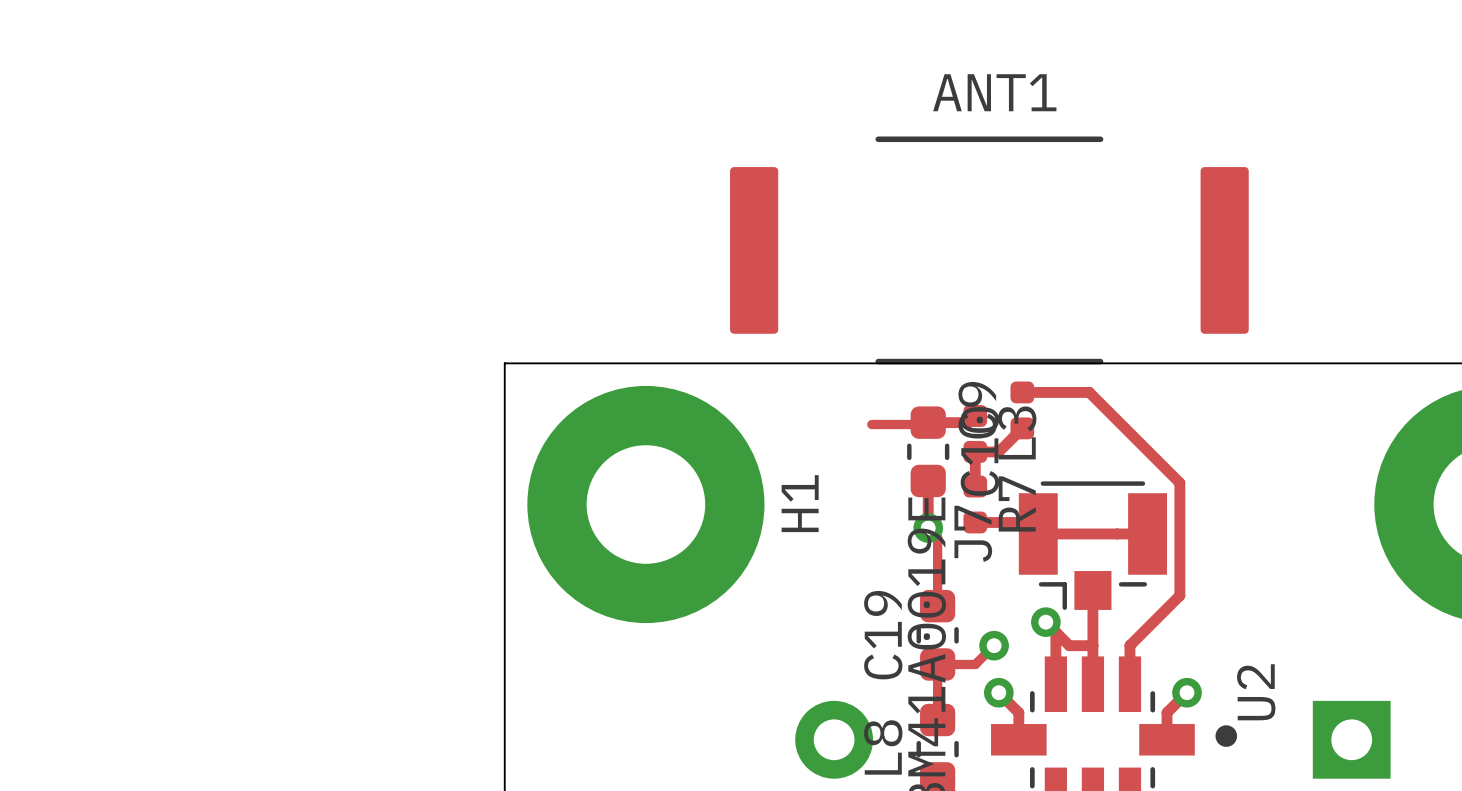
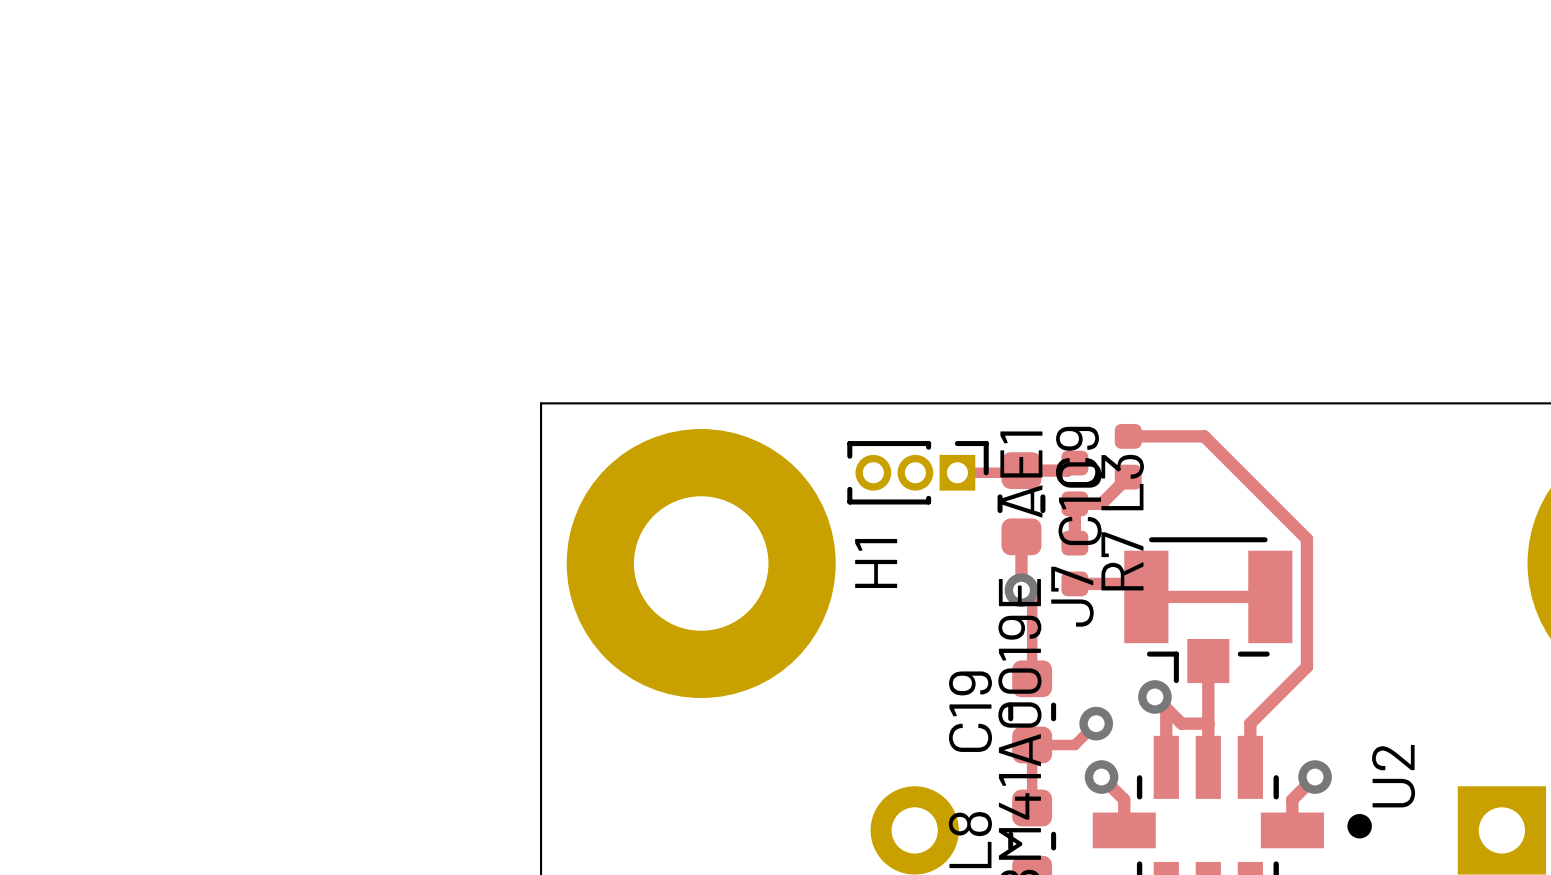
ANT1: (989, 250) -> none
AE1: none -> (918, 472)

